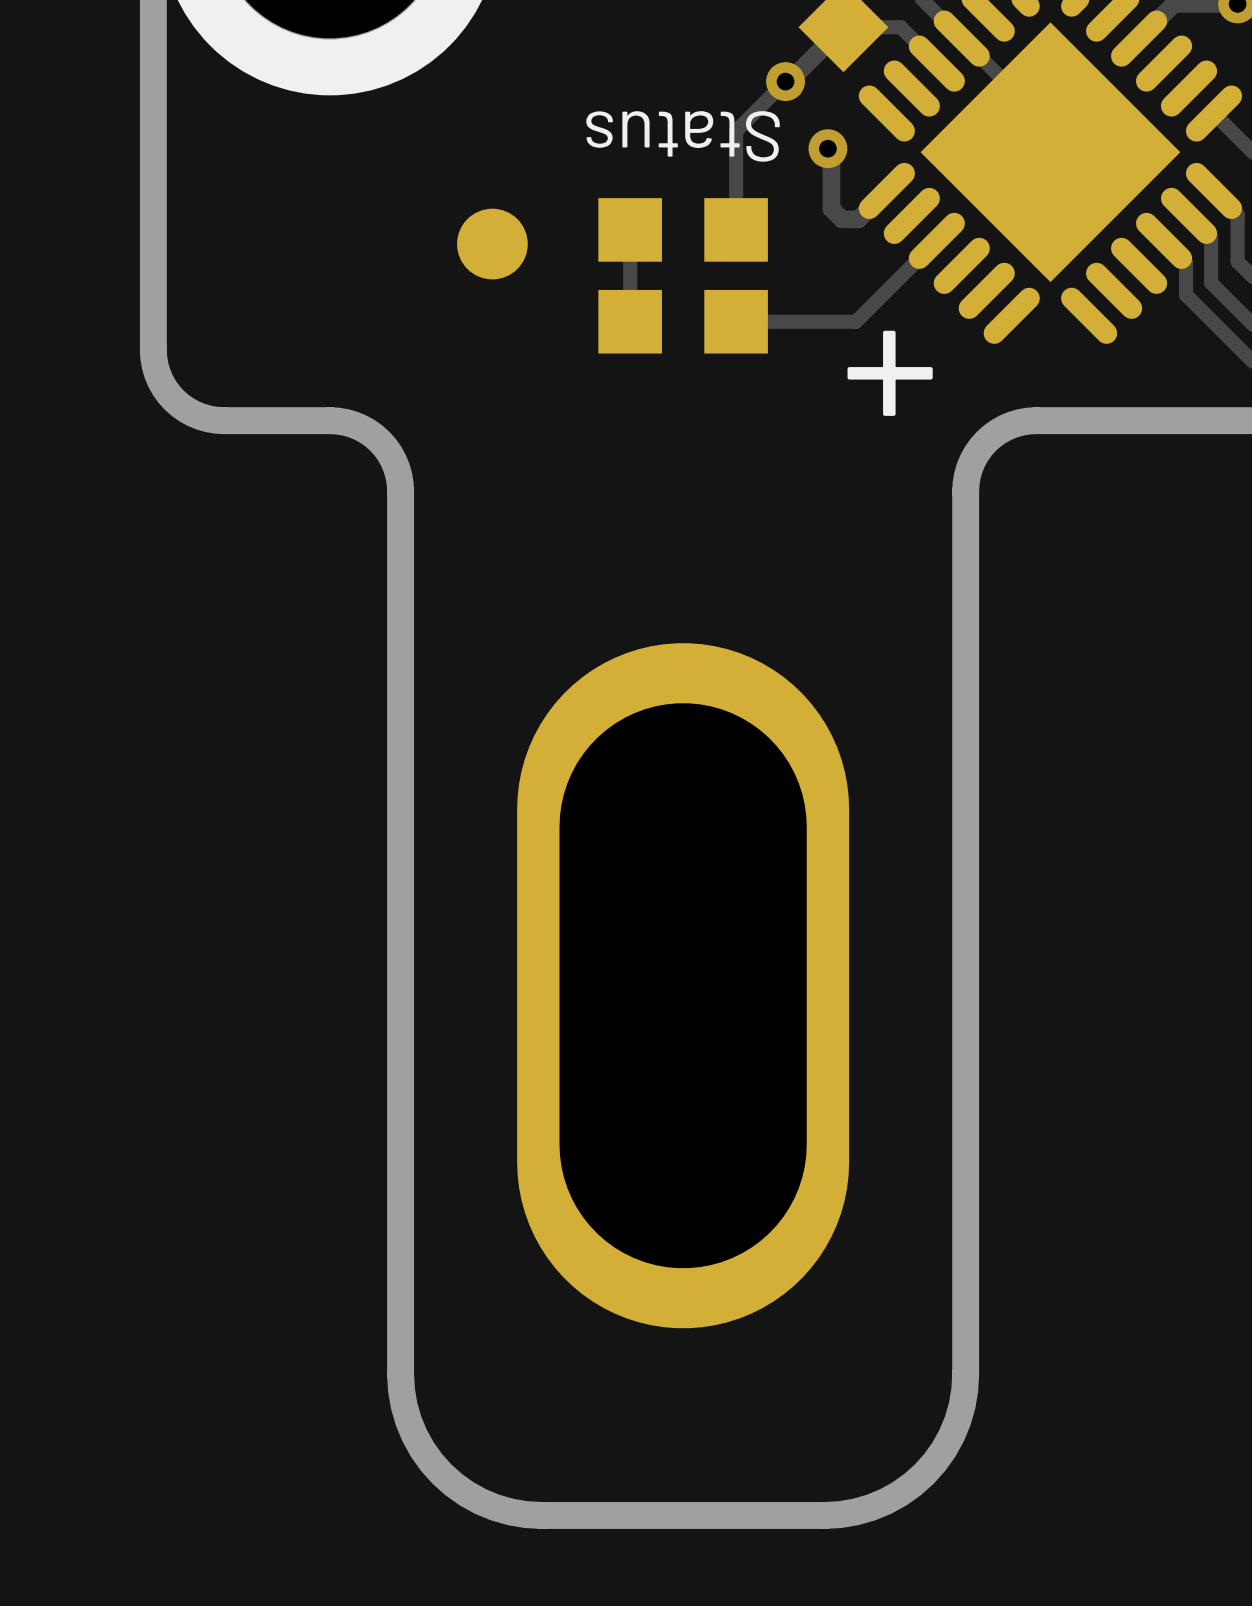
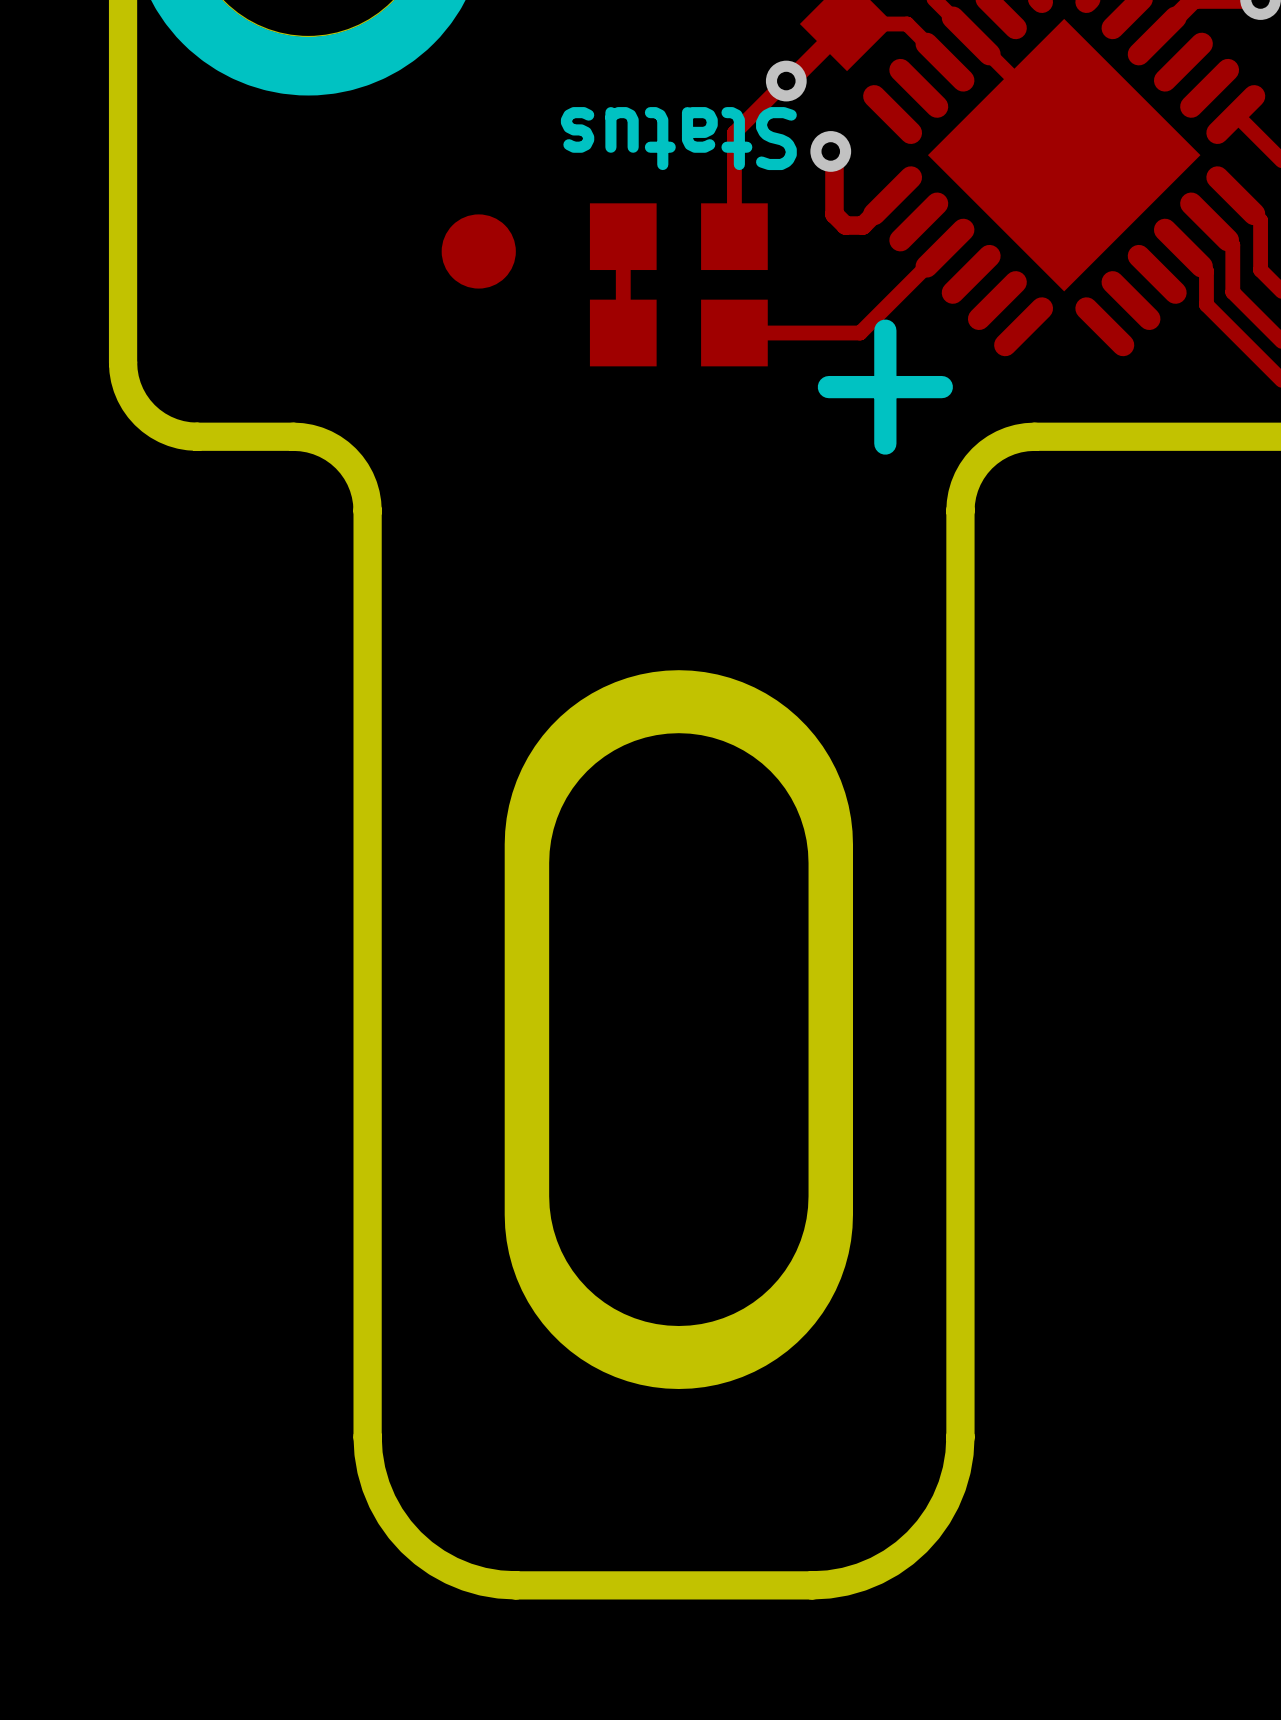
board edge: (315, 420) (345, 422) (360, 427) (373, 436) (389, 453) (396, 467) (400, 483) (400, 1374) (404, 1405) (414, 1435) (422, 1449) (431, 1462) (453, 1484) (480, 1501) (495, 1507) (526, 1514) (541, 1515) -> (293, 436) (309, 438) (325, 444) (345, 458) (360, 478) (367, 502) (367, 1437) (371, 1470) (375, 1486) (390, 1516) (399, 1529) (423, 1553) (436, 1562) (466, 1577) (499, 1584) (530, 1585)
board edge: (1036, 420) (1012, 424) (992, 436) (976, 453) (969, 467) (966, 483) (965, 1374) (962, 1405) (951, 1435) (944, 1449) (924, 1474) (912, 1484) (885, 1501) (871, 1507) (840, 1514) (810, 1515) -> (1049, 436) (1018, 438) (1002, 444) (988, 452) (971, 471) (964, 486) (960, 502) (960, 1437) (956, 1470) (945, 1501) (937, 1516) (928, 1529) (904, 1553) (891, 1562) (861, 1577) (828, 1584) (812, 1585)

